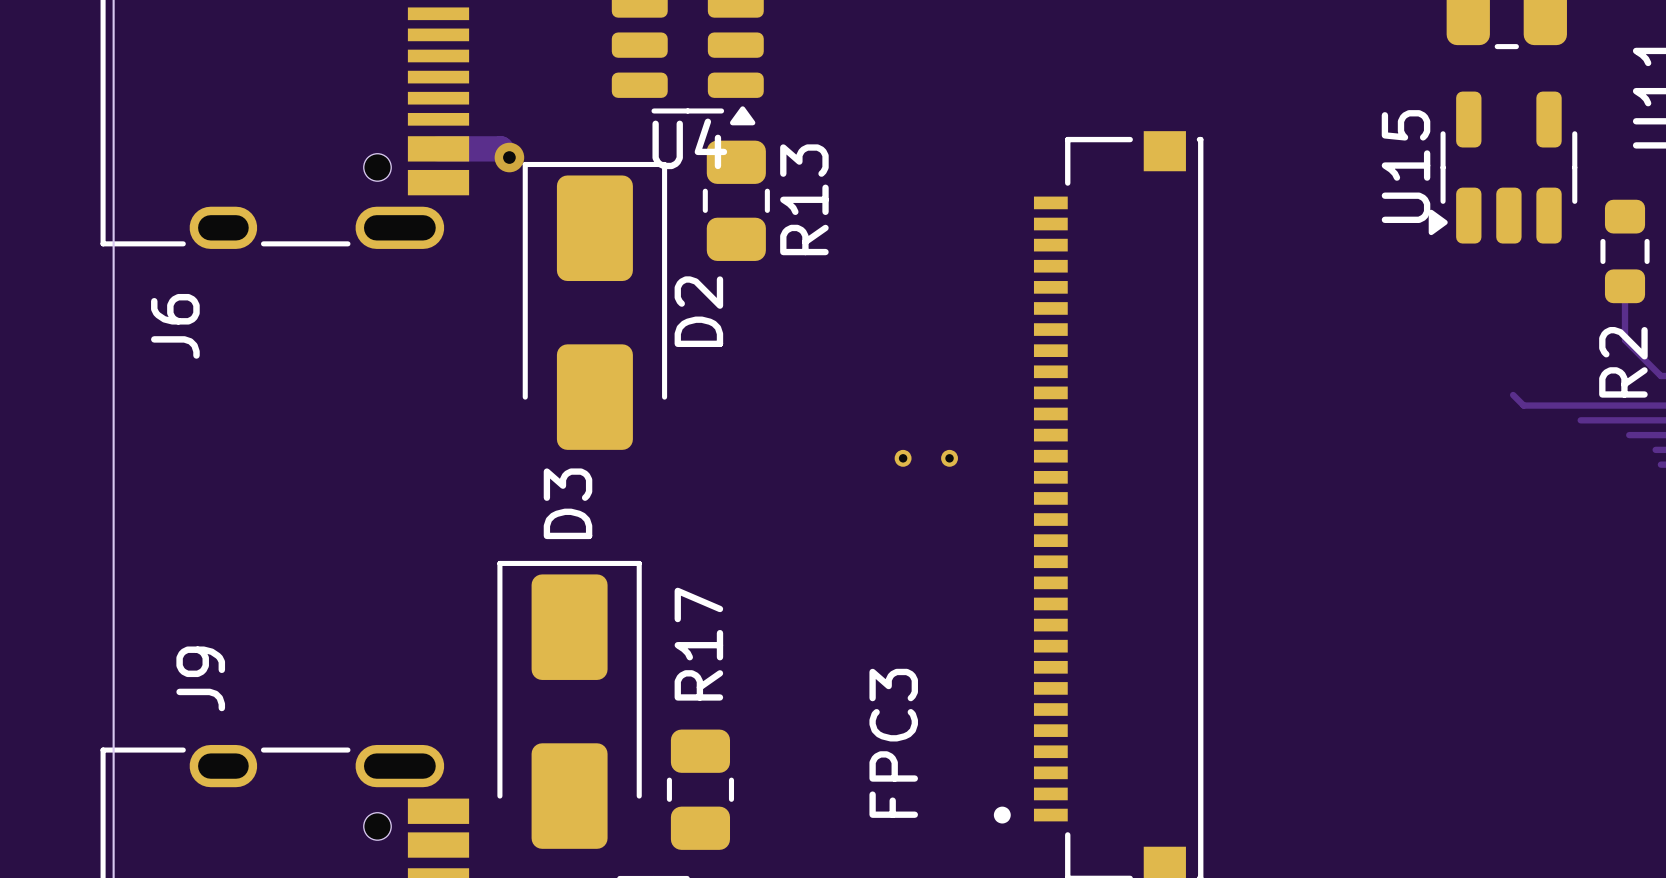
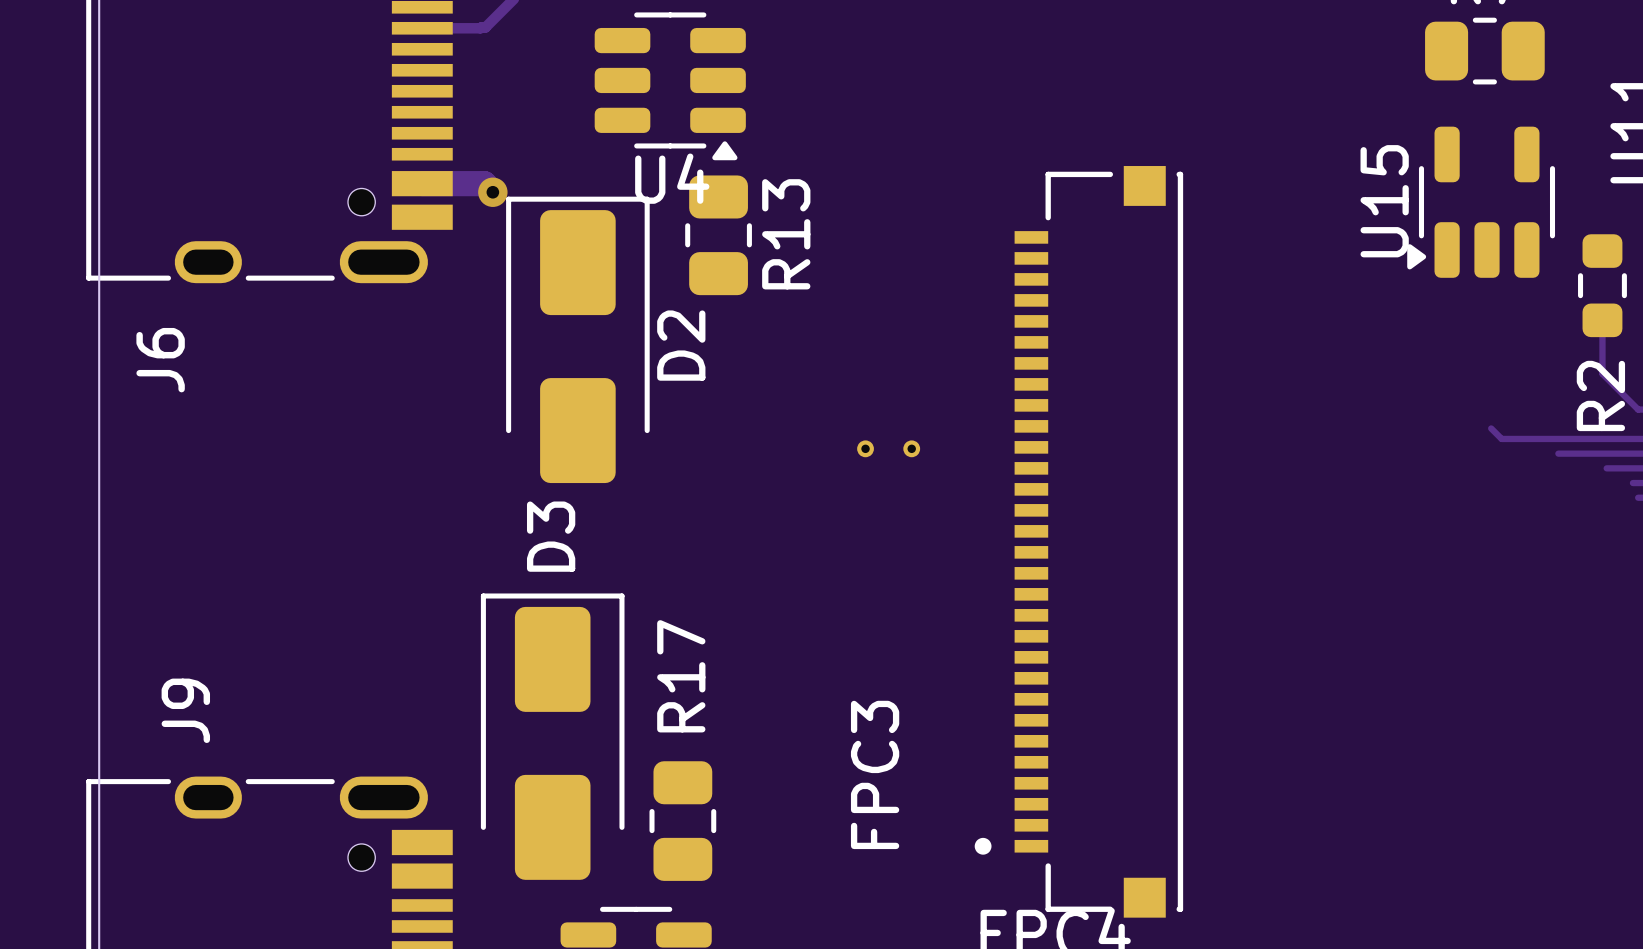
part position: (926, 458) -> (888, 448)

